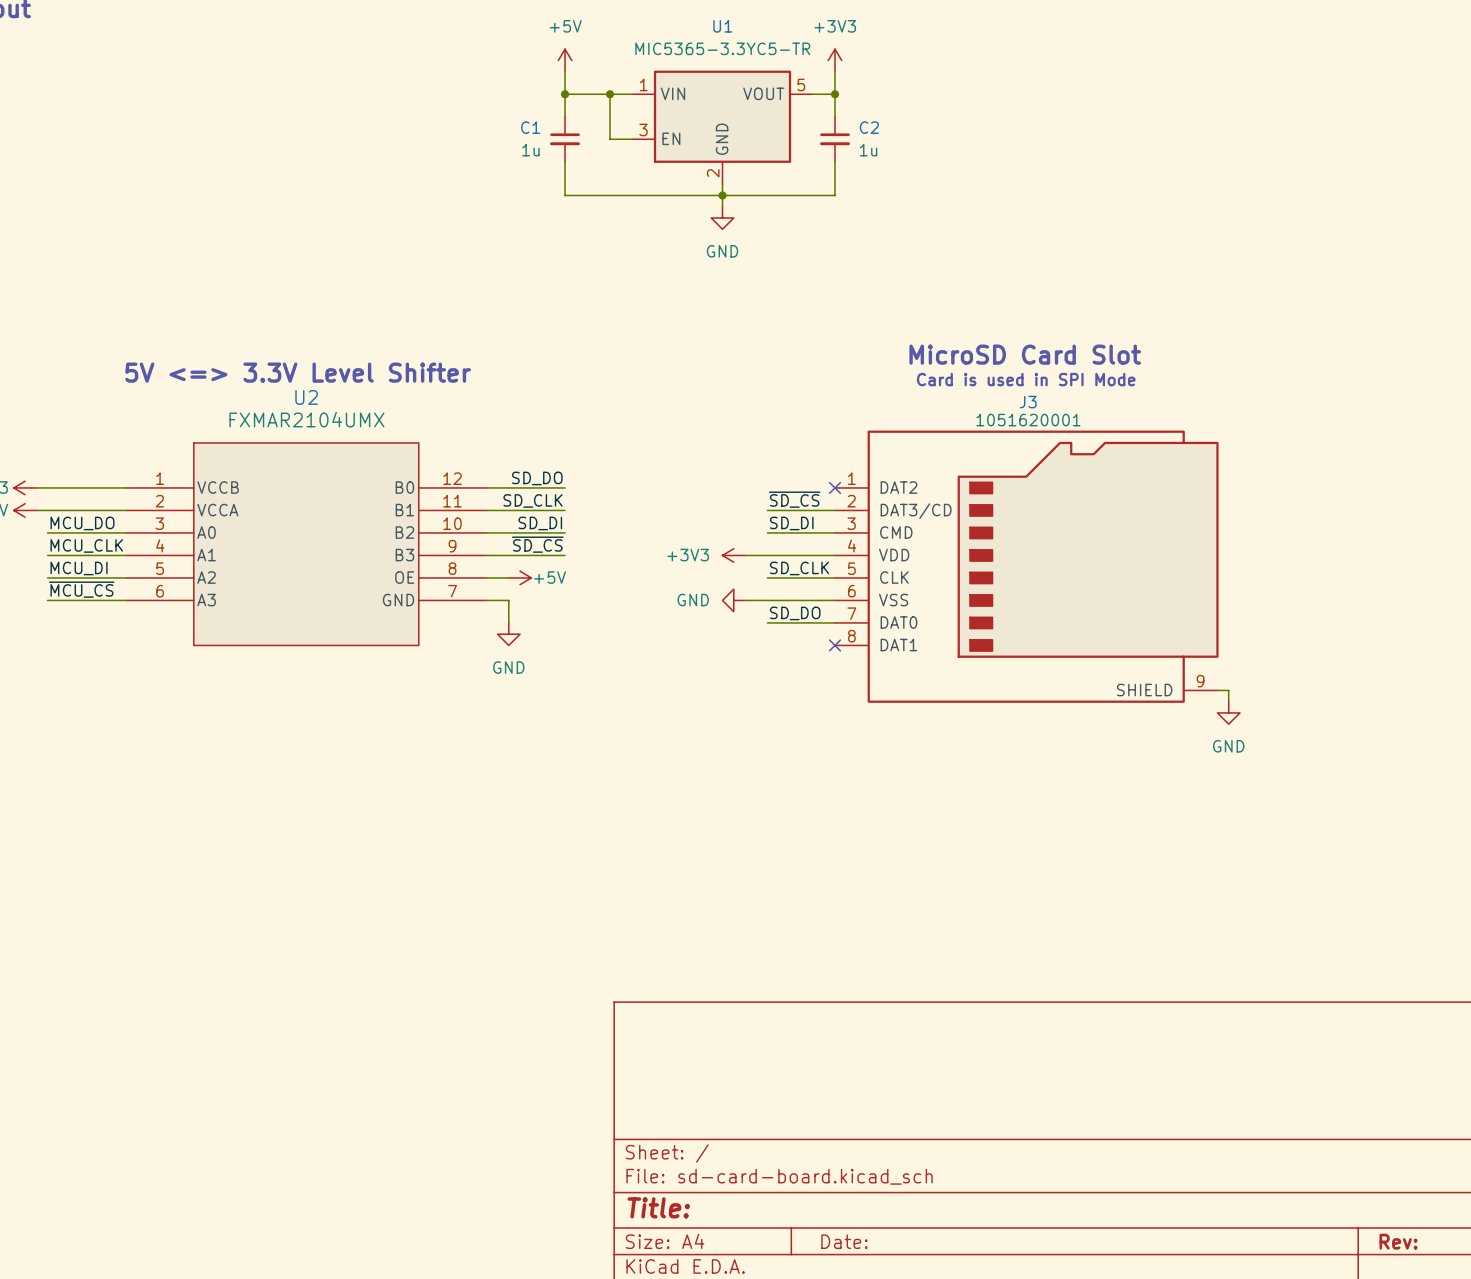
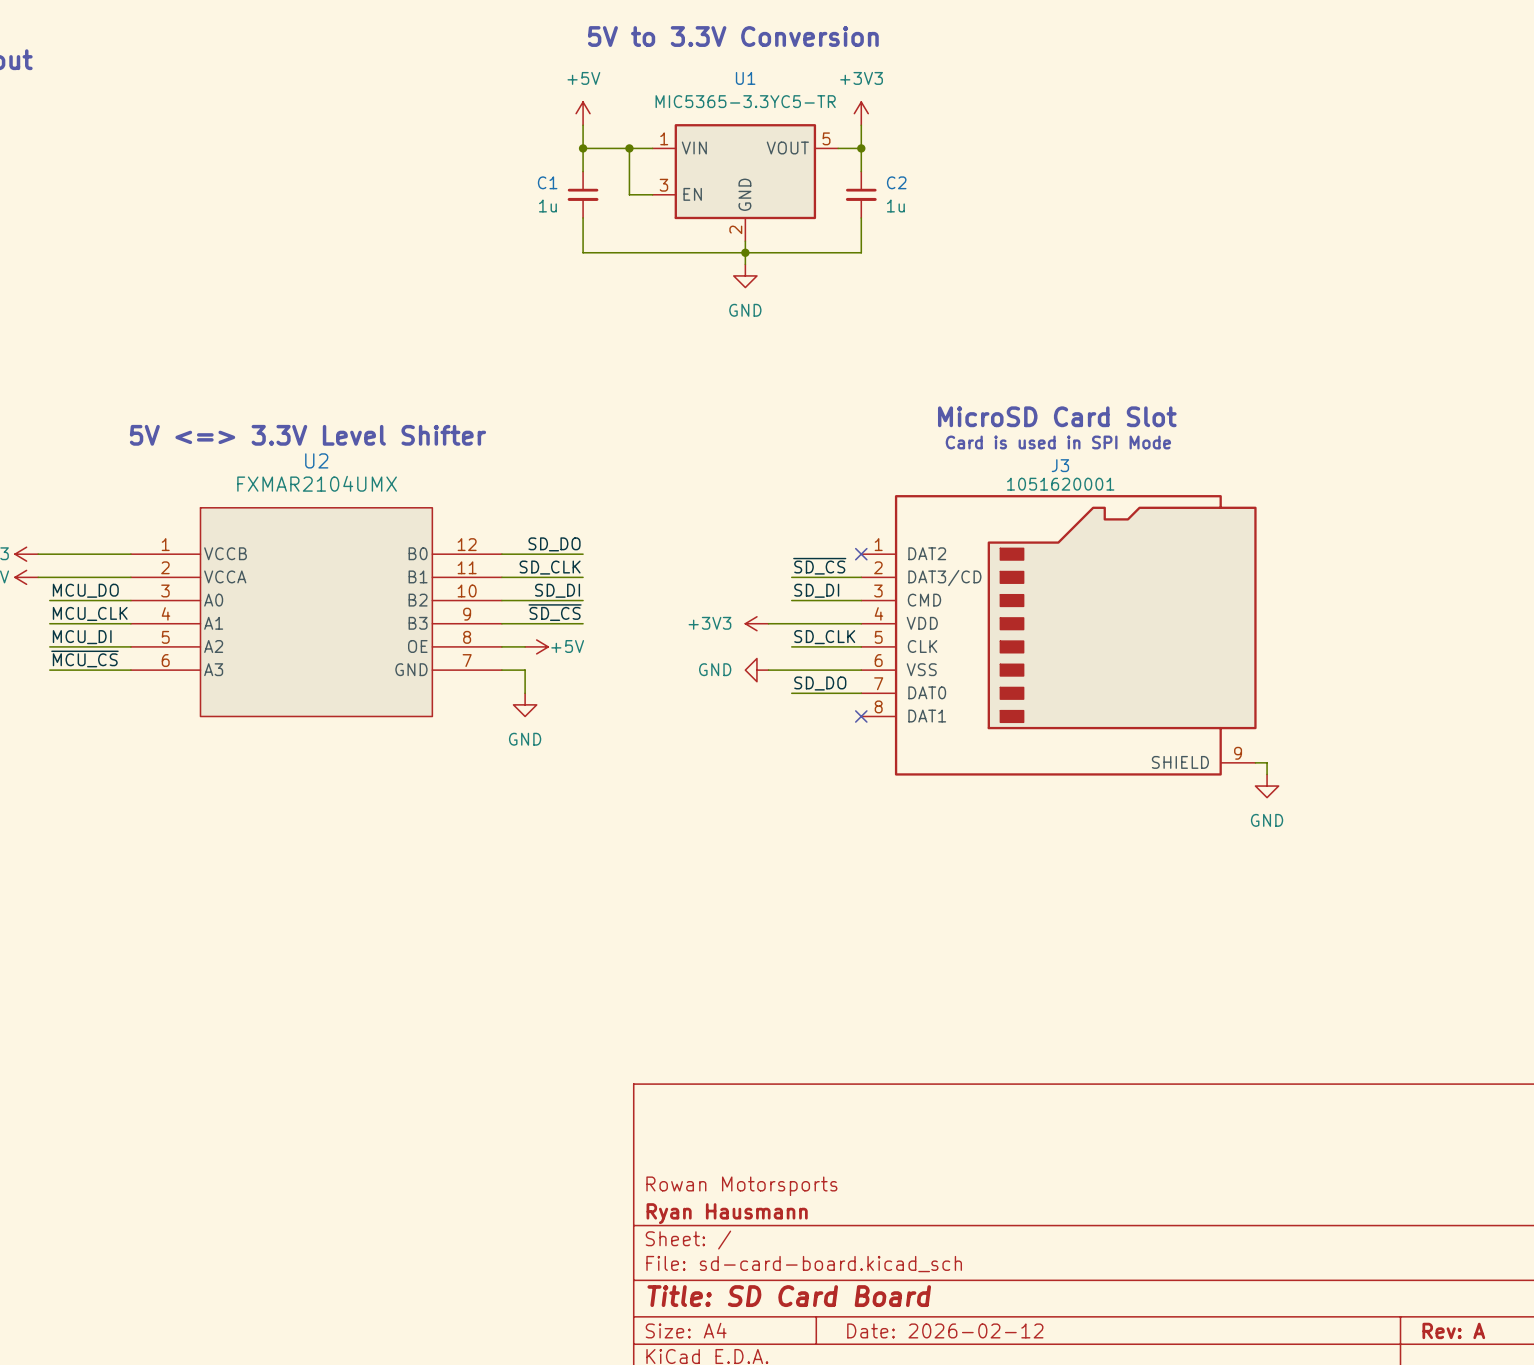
title block: none -> Rowan Motorsports (741, 1186)
title block: none -> Ryan Hausmann (727, 1213)
title block: Title: (658, 1207) -> Title: SD Card Board (789, 1296)
title block: Date: (844, 1241) -> Date: 2026-02-12 (945, 1330)
title block: Rev: (1398, 1241) -> Rev: A (1453, 1330)

